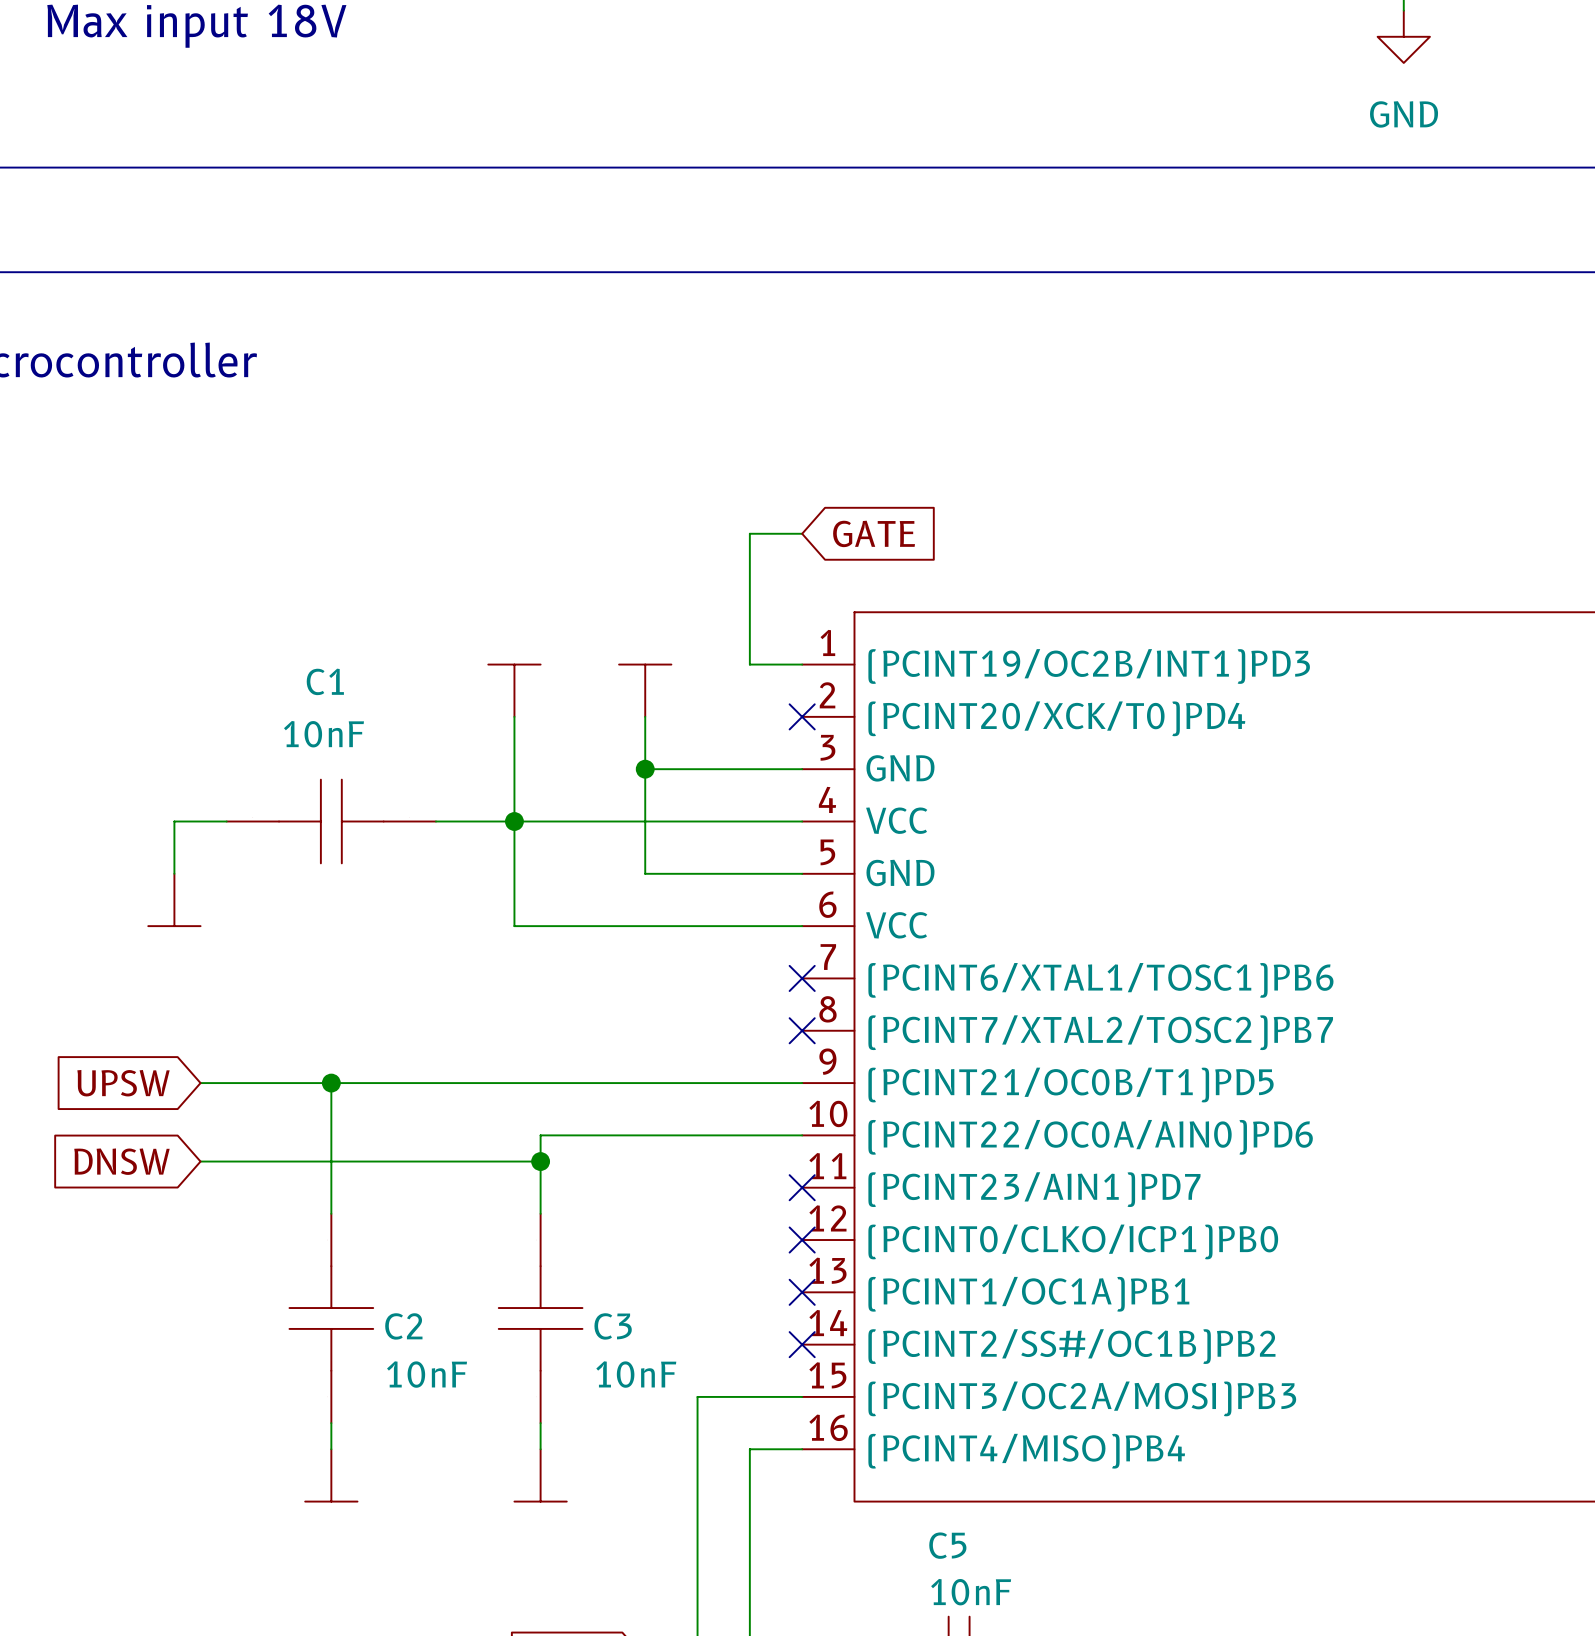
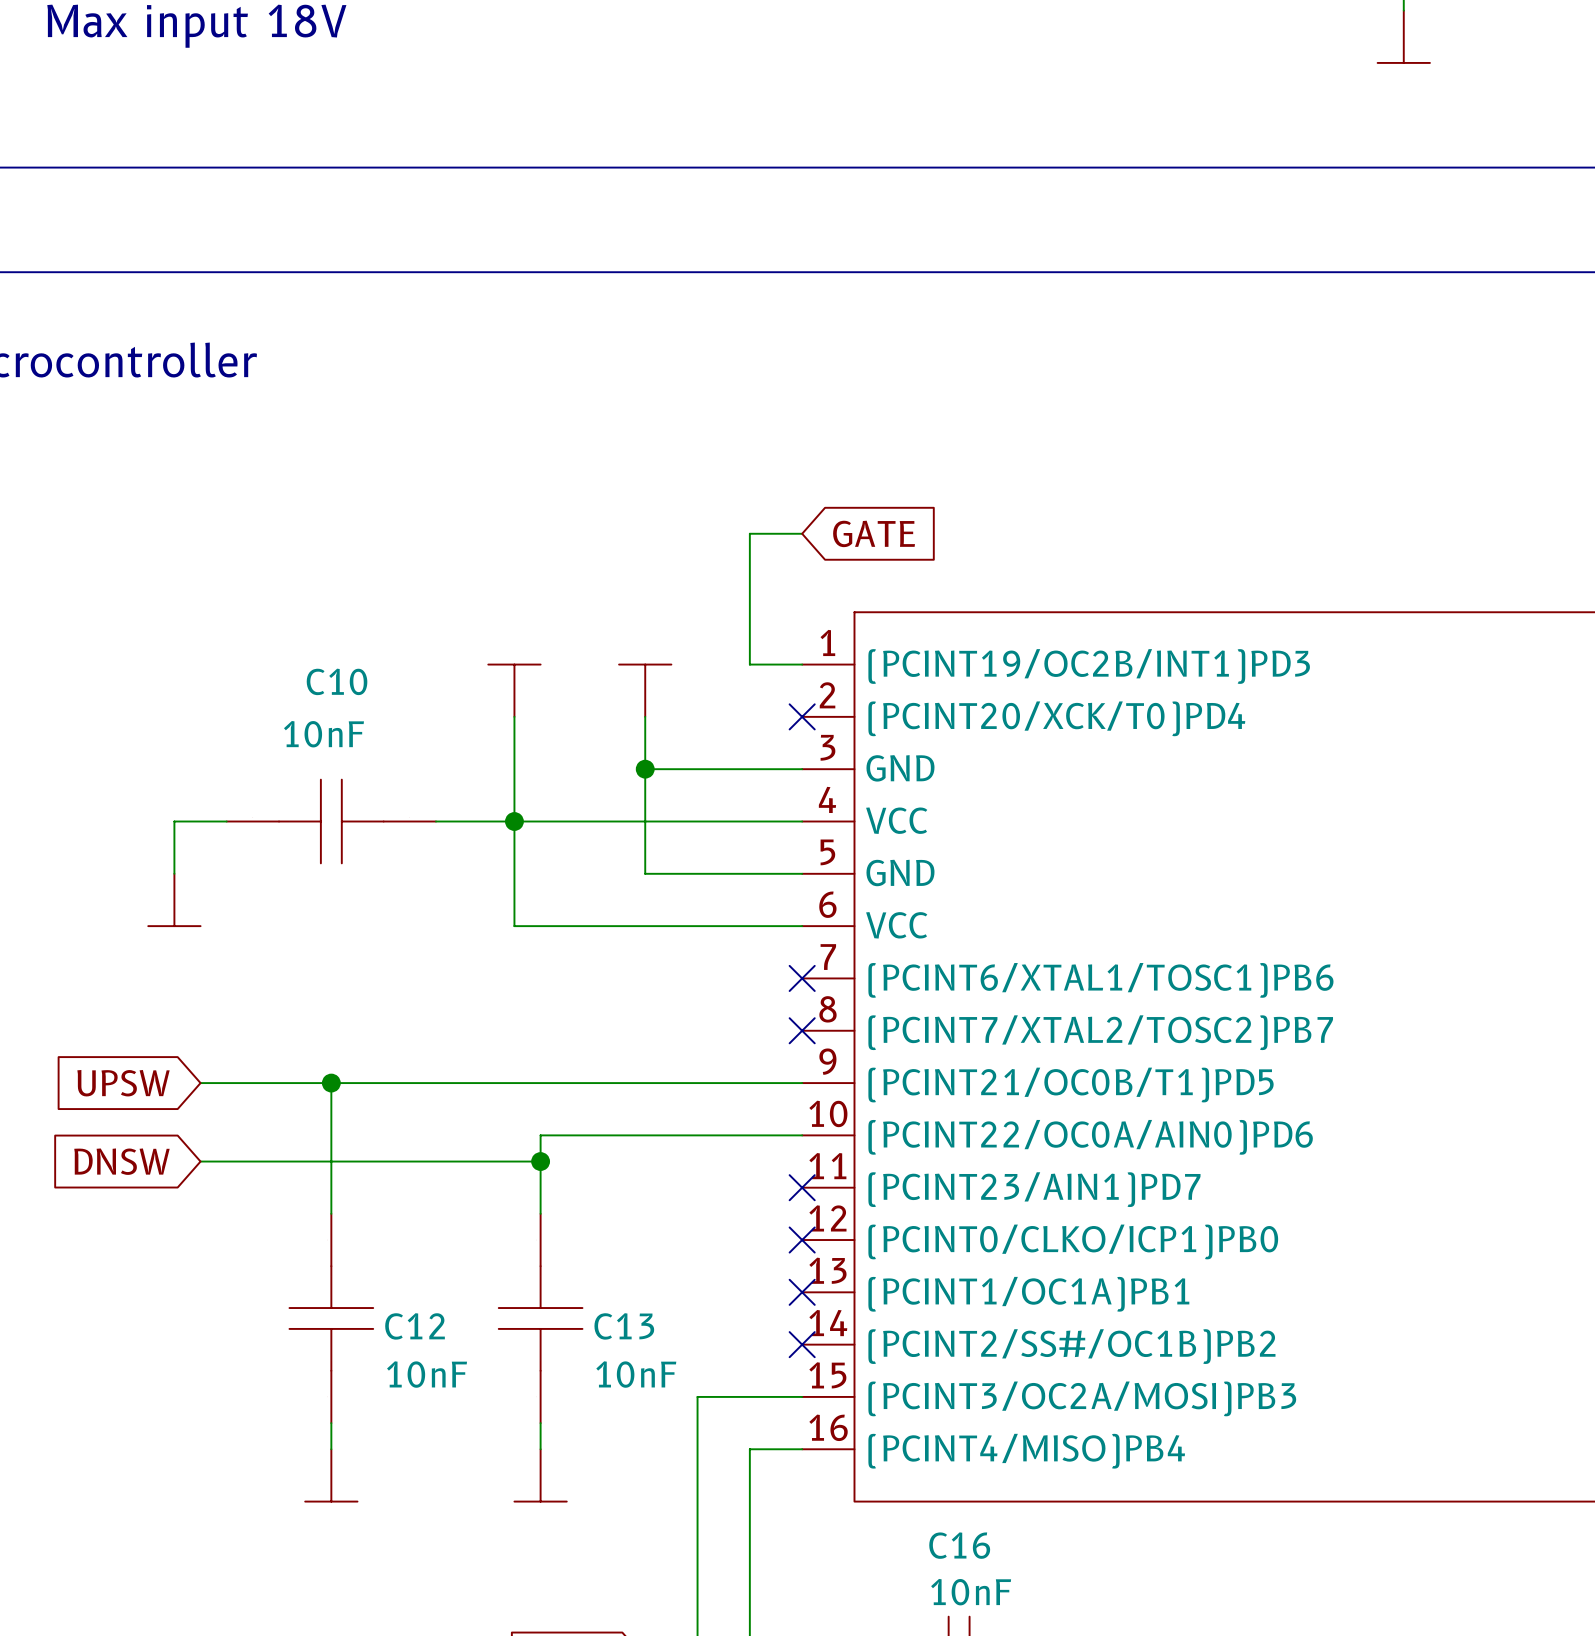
power symbol shape: [1377, 10, 1430, 63] -> [1377, 10, 1430, 63]
power symbol text: GND (1404, 114) -> none
C1 name: C1 (325, 681) -> C10 (337, 681)
C2 name: C2 (403, 1326) -> C12 (415, 1326)
C3 name: C3 (613, 1326) -> C13 (624, 1326)
C5 name: C5 (947, 1545) -> C16 (959, 1545)

